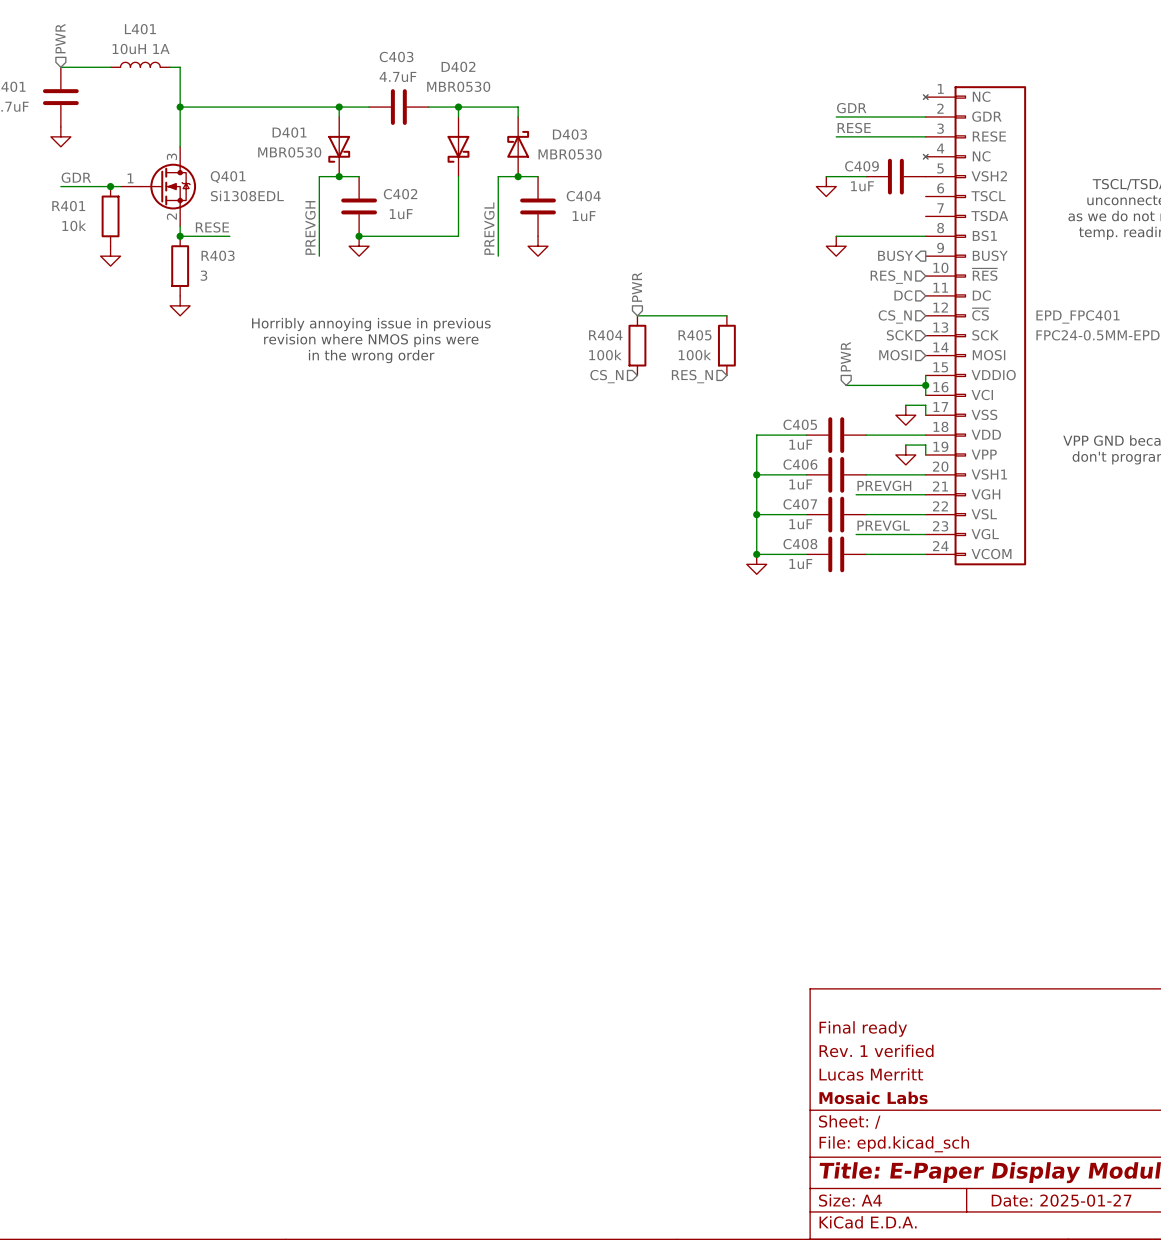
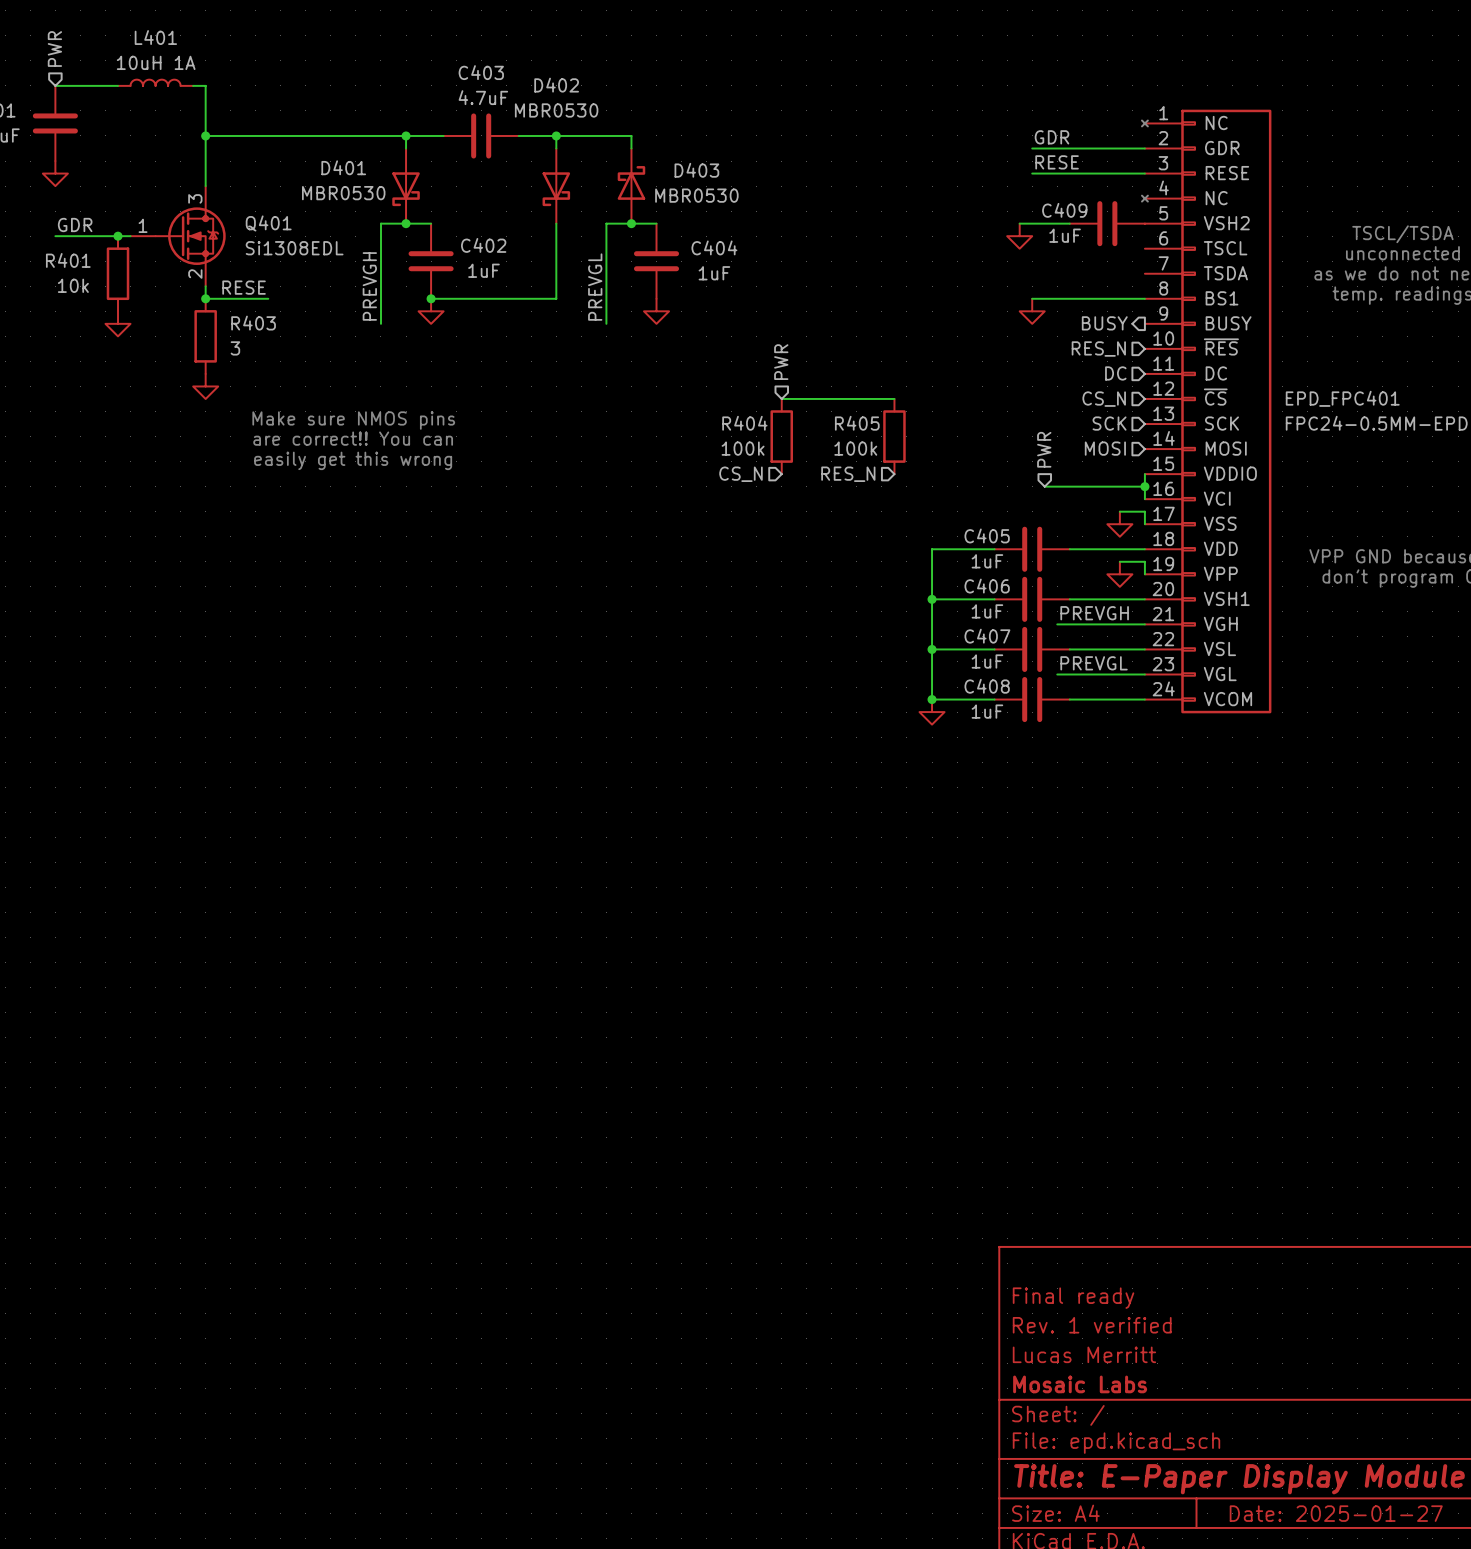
text: Horribly annoying issue in previous (371, 324) -> none
text: none -> Make sure NMOS pins (353, 420)
text: revision where NMOS pins were (371, 340) -> none
text: none -> are correct!! You can (353, 438)
text: in the wrong order (371, 356) -> none
text: none -> easily get this wrong (353, 460)

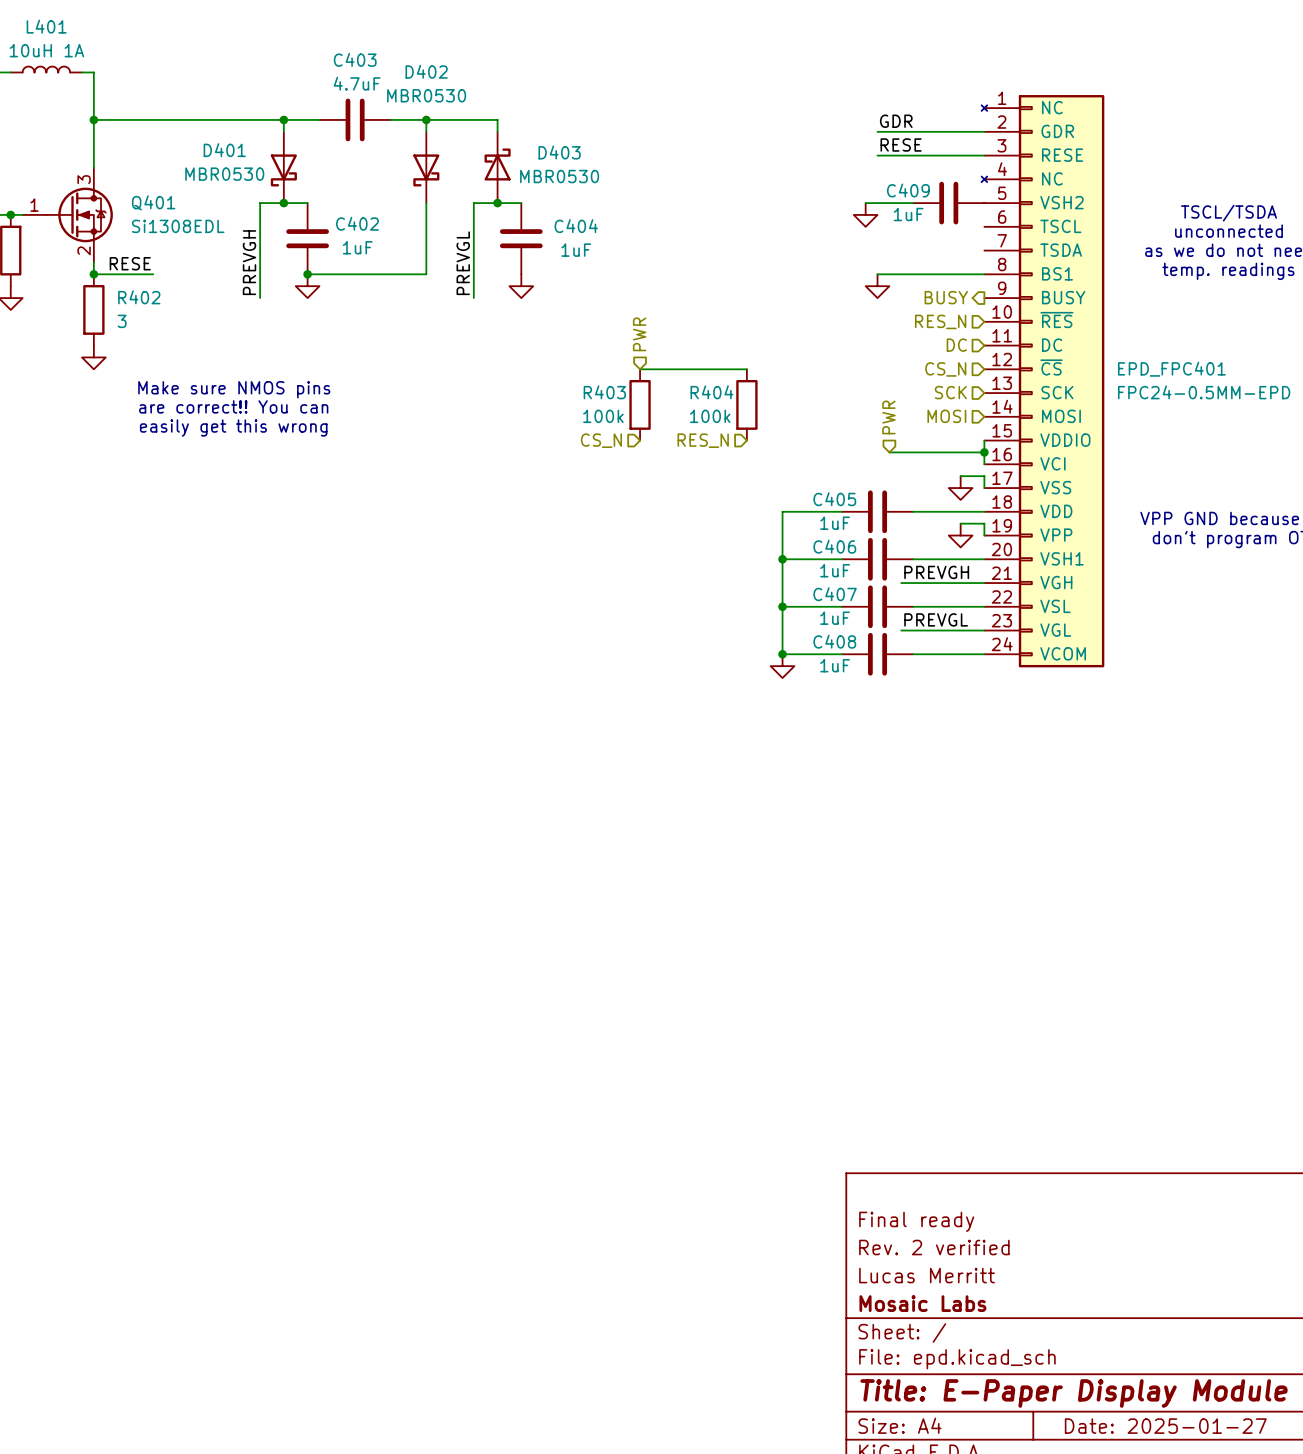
R403 name: R403 (253, 323) -> R402 (139, 297)
R404 name: R404 (744, 423) -> R403 (604, 392)
R405 name: R405 (857, 423) -> R404 (711, 392)
title block: Rev. 1 verified (1092, 1325) -> Rev. 2 verified (934, 1247)

